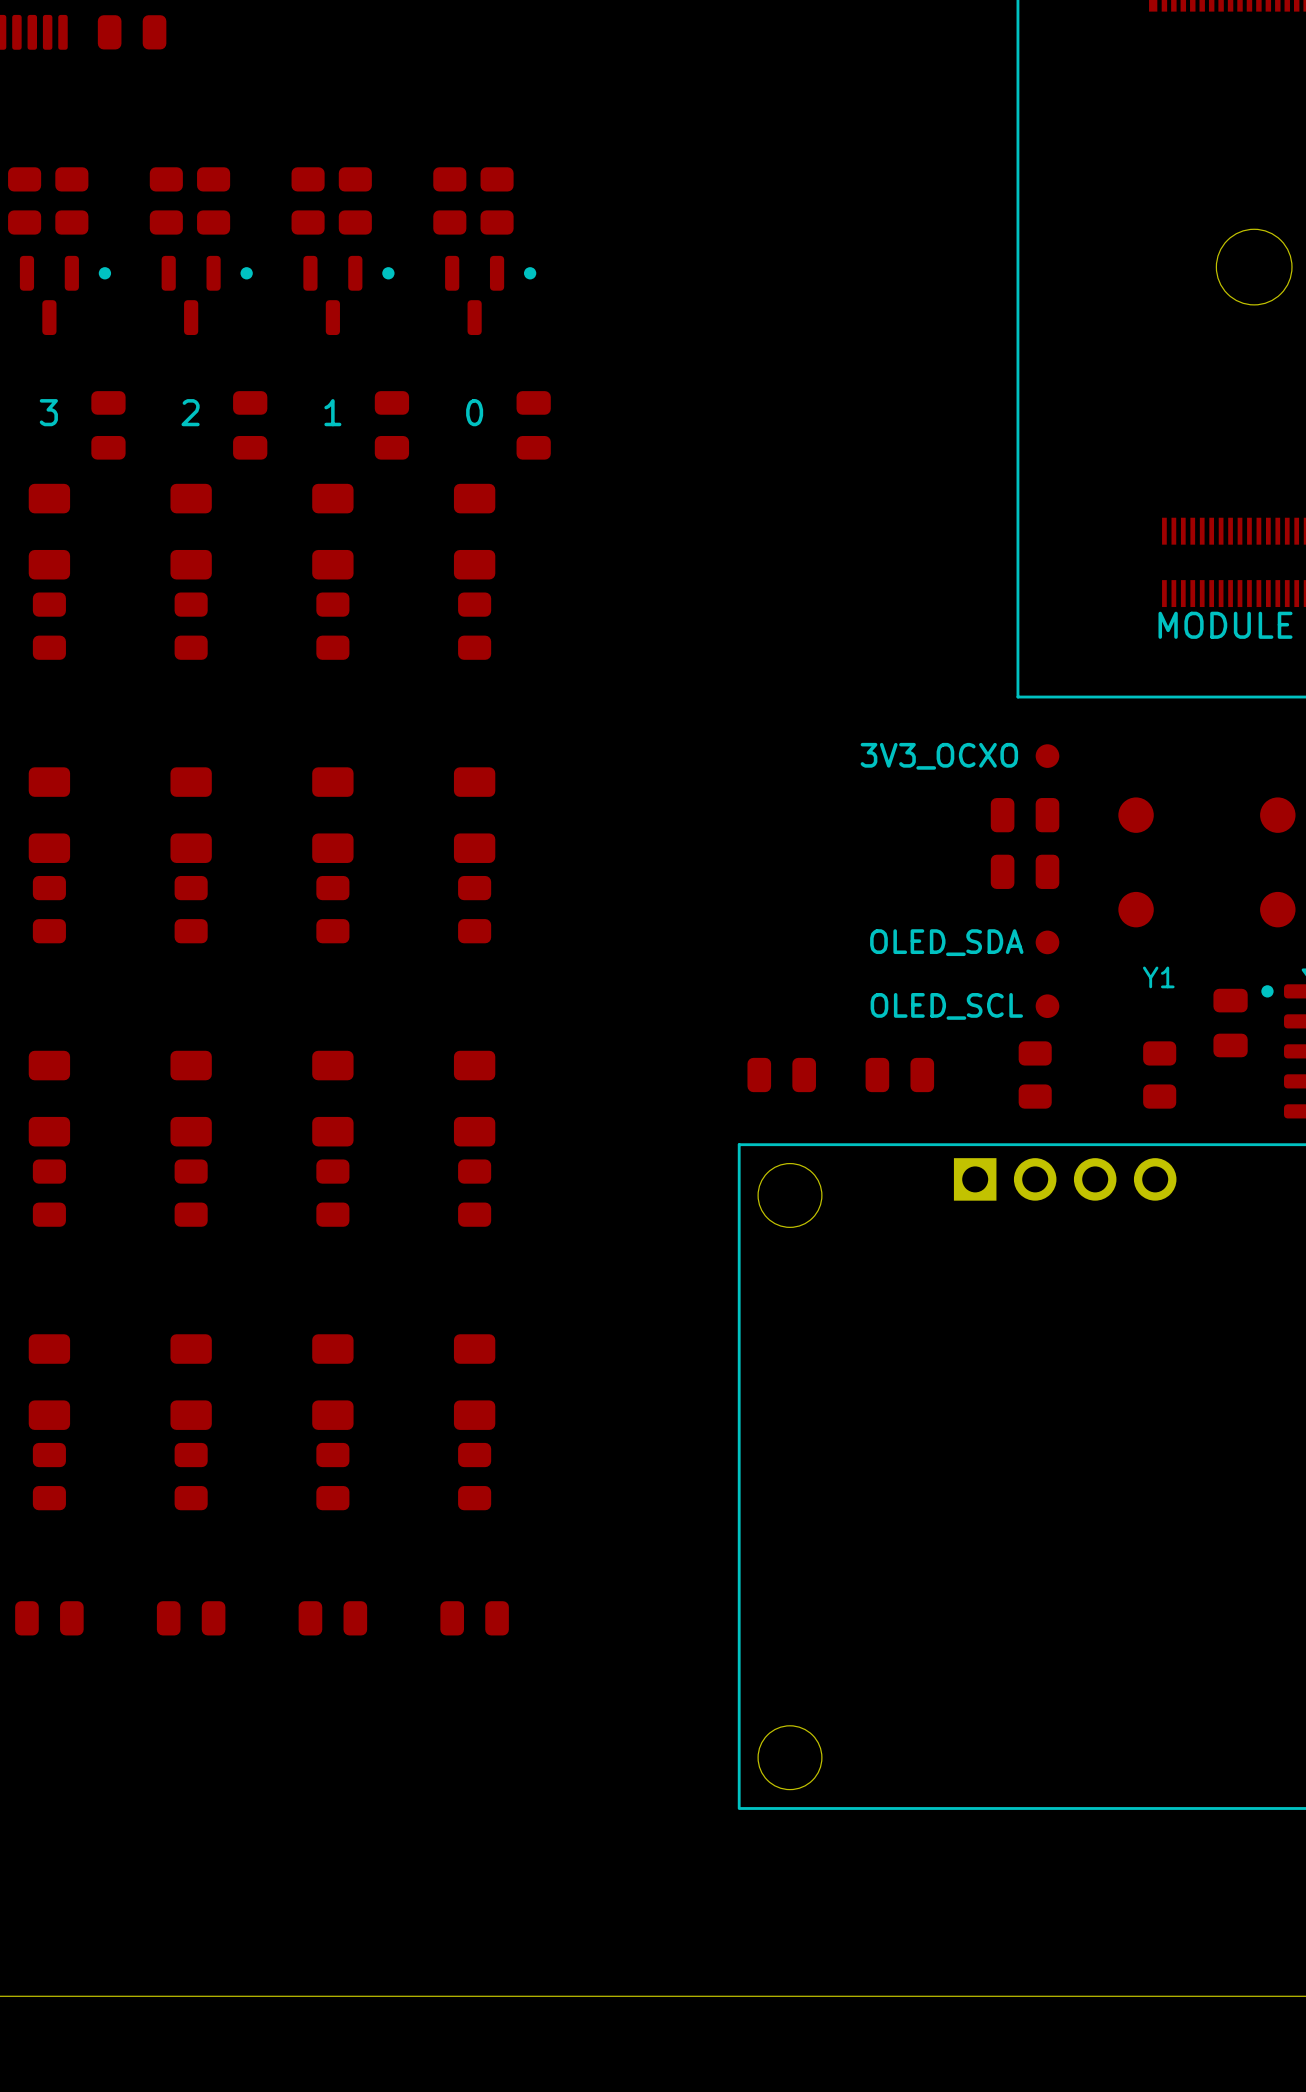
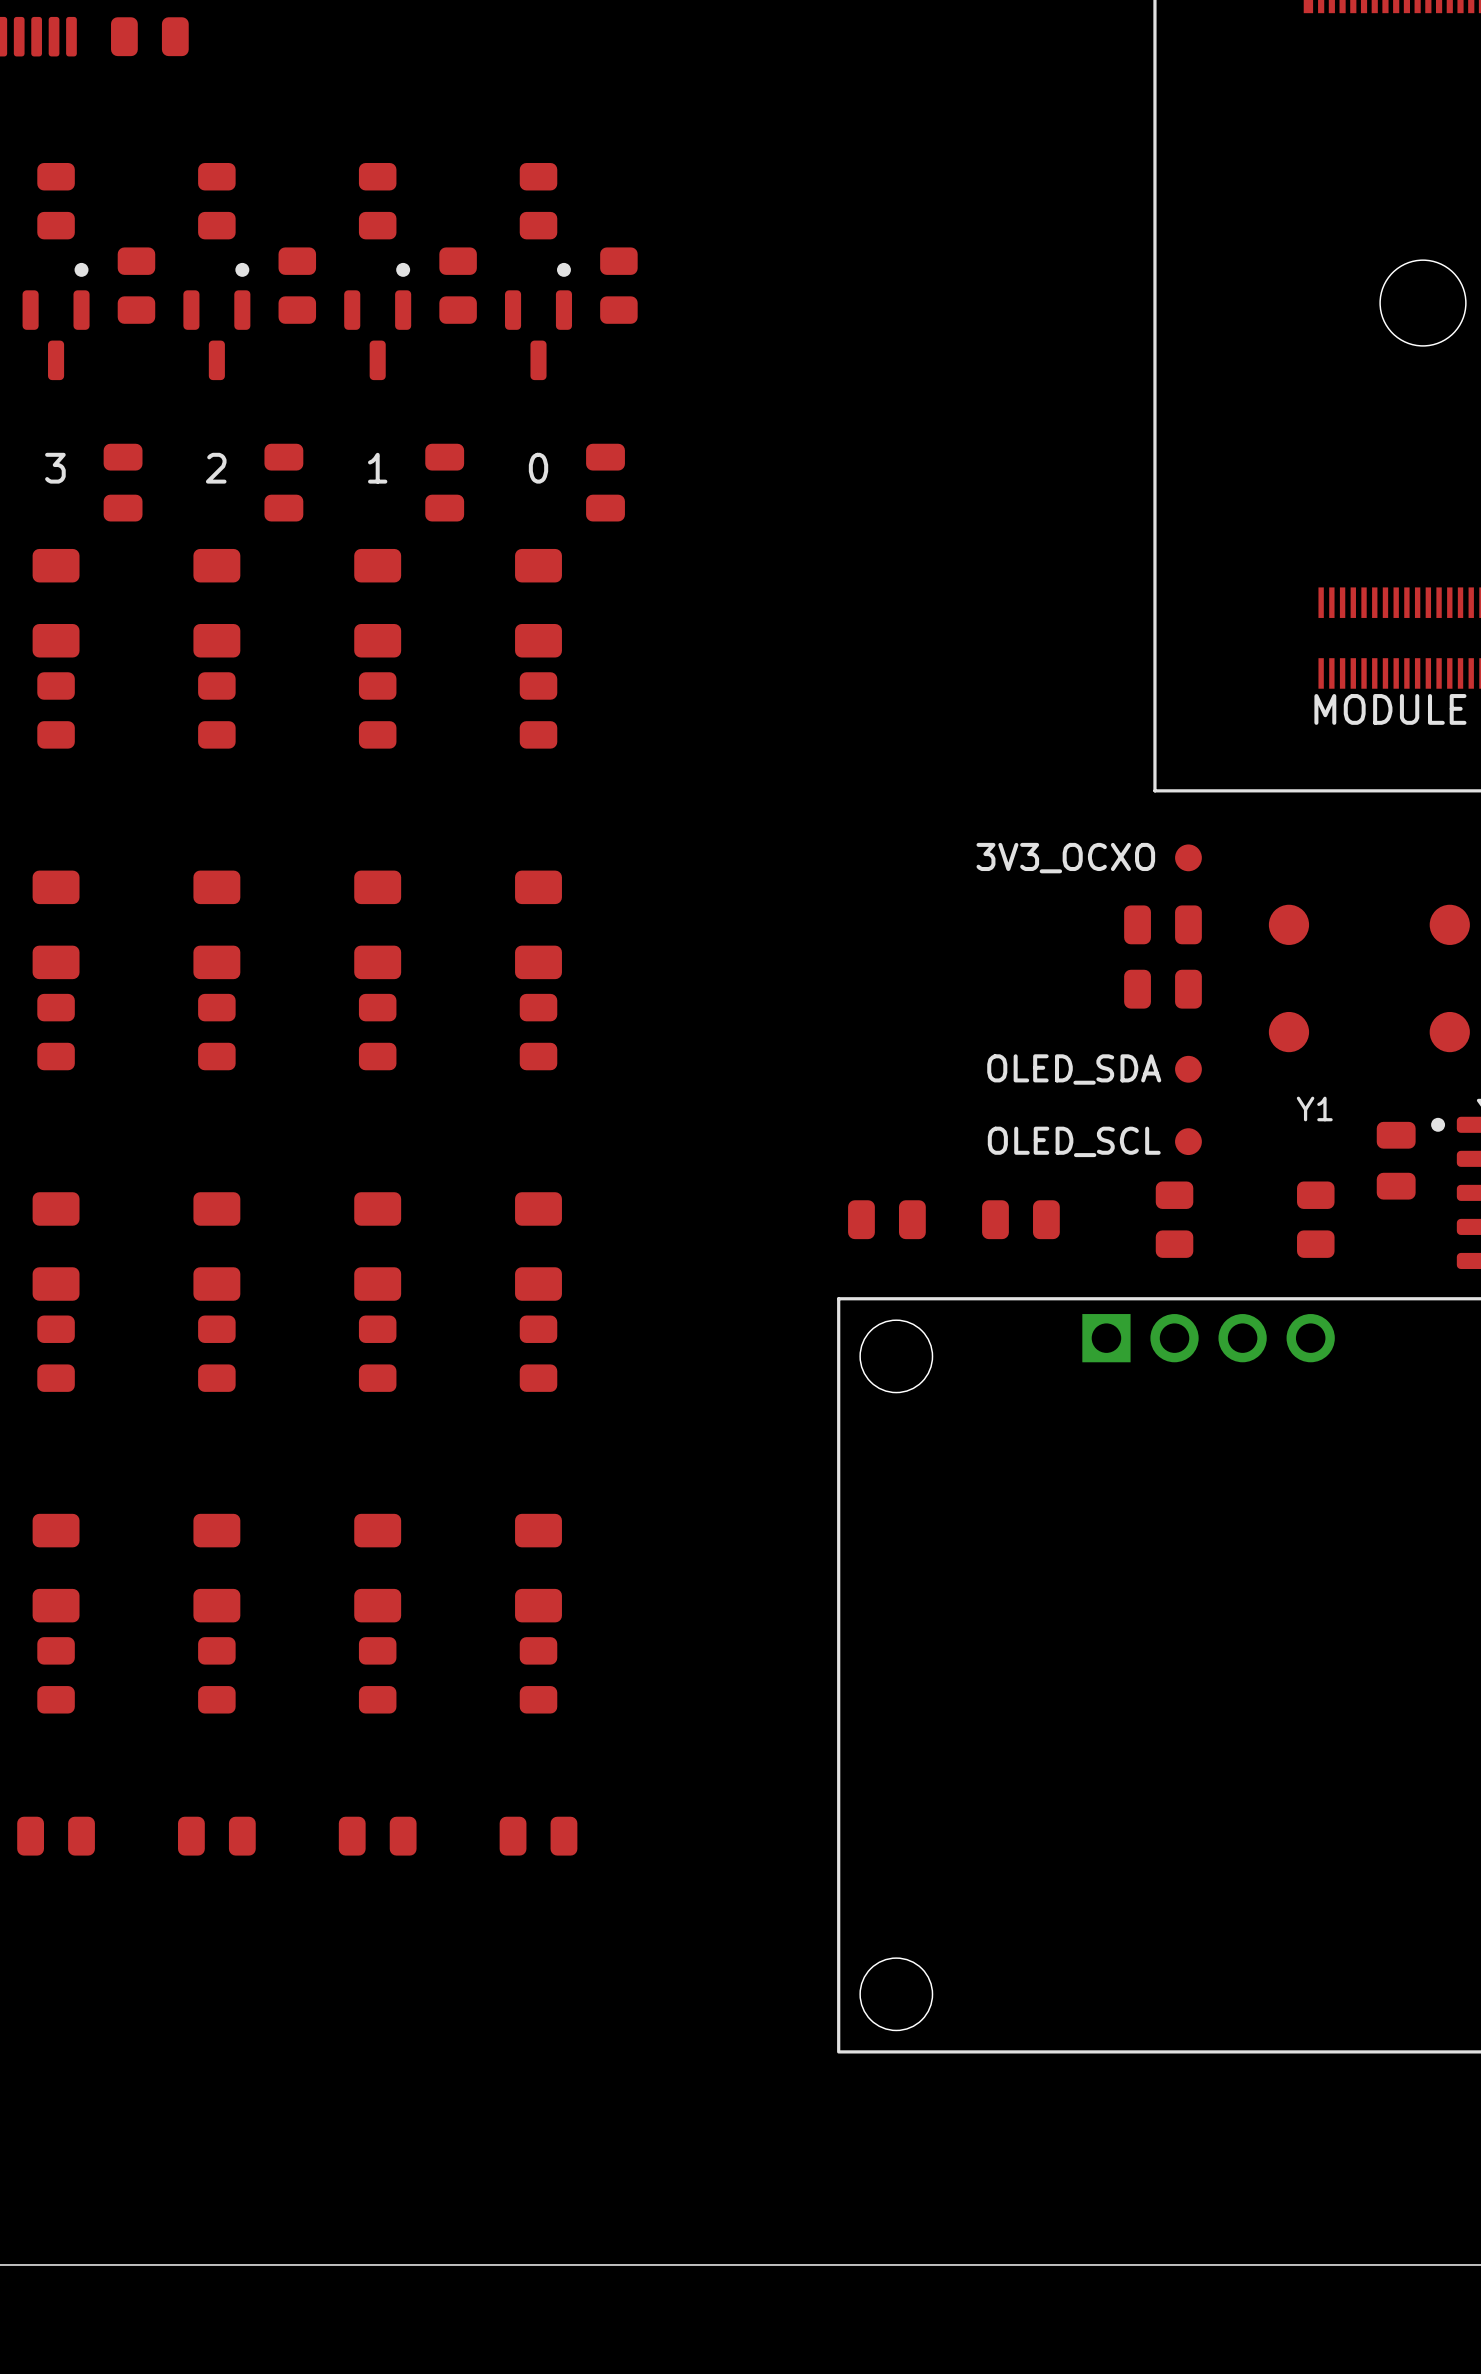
part: none -> (56, 201)
part: none -> (216, 201)
part: none -> (377, 201)
part: none -> (538, 201)
part: (24, 200) -> none
part: (71, 200) -> none
part: (166, 200) -> none
part: (213, 200) -> none
part: (308, 200) -> none
part: (355, 200) -> none
part: (449, 200) -> none
part: (497, 200) -> none
part: none -> (136, 285)
part: none -> (297, 285)
part: none -> (458, 285)
part: none -> (618, 285)
drawing position: (104, 273) -> (81, 269)
drawing position: (246, 273) -> (242, 269)
drawing position: (388, 273) -> (403, 269)
drawing position: (530, 273) -> (563, 269)

